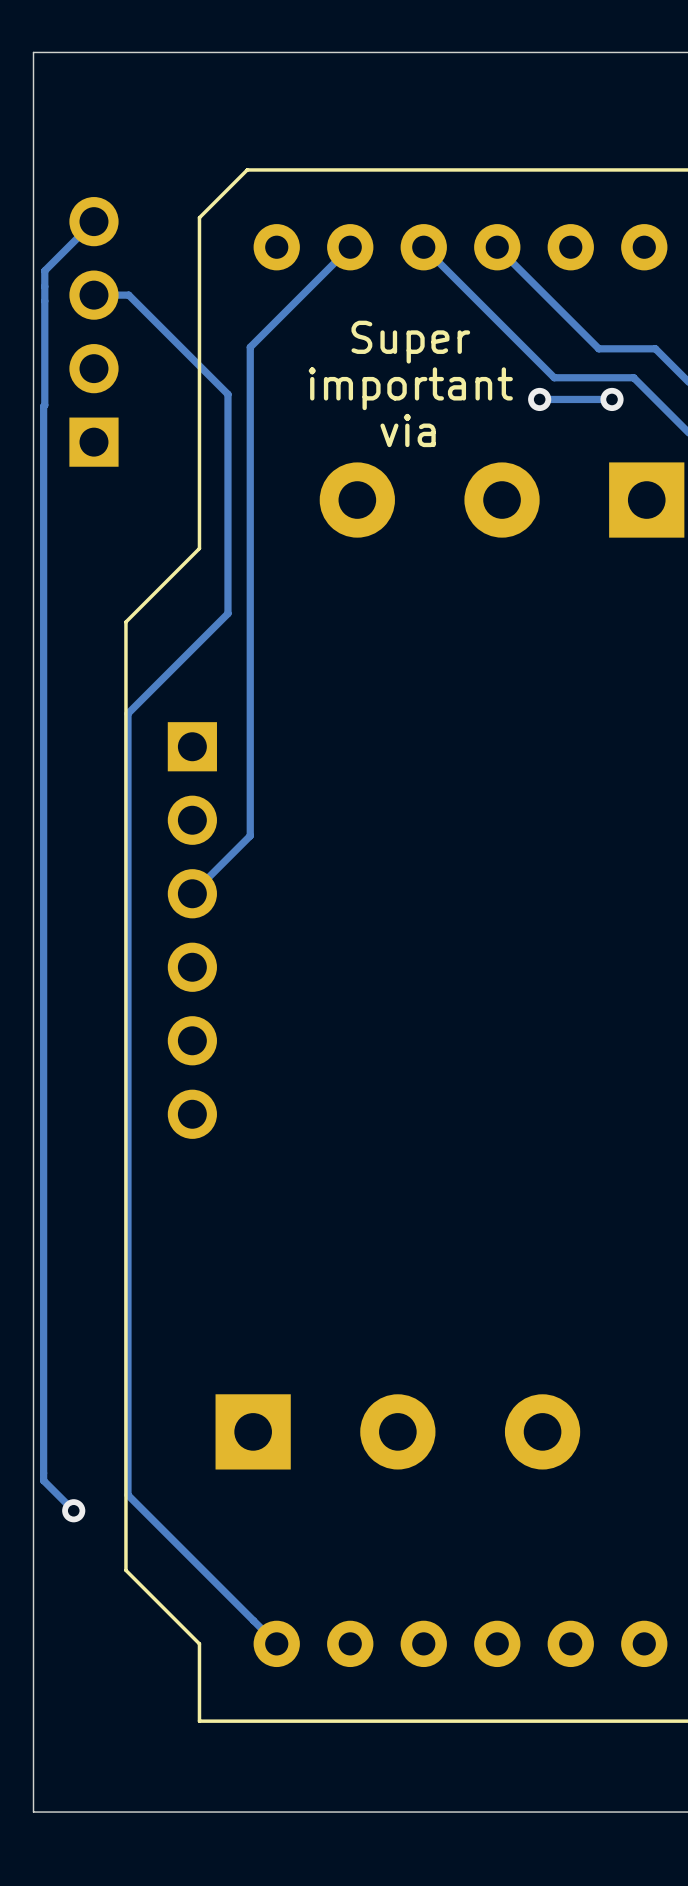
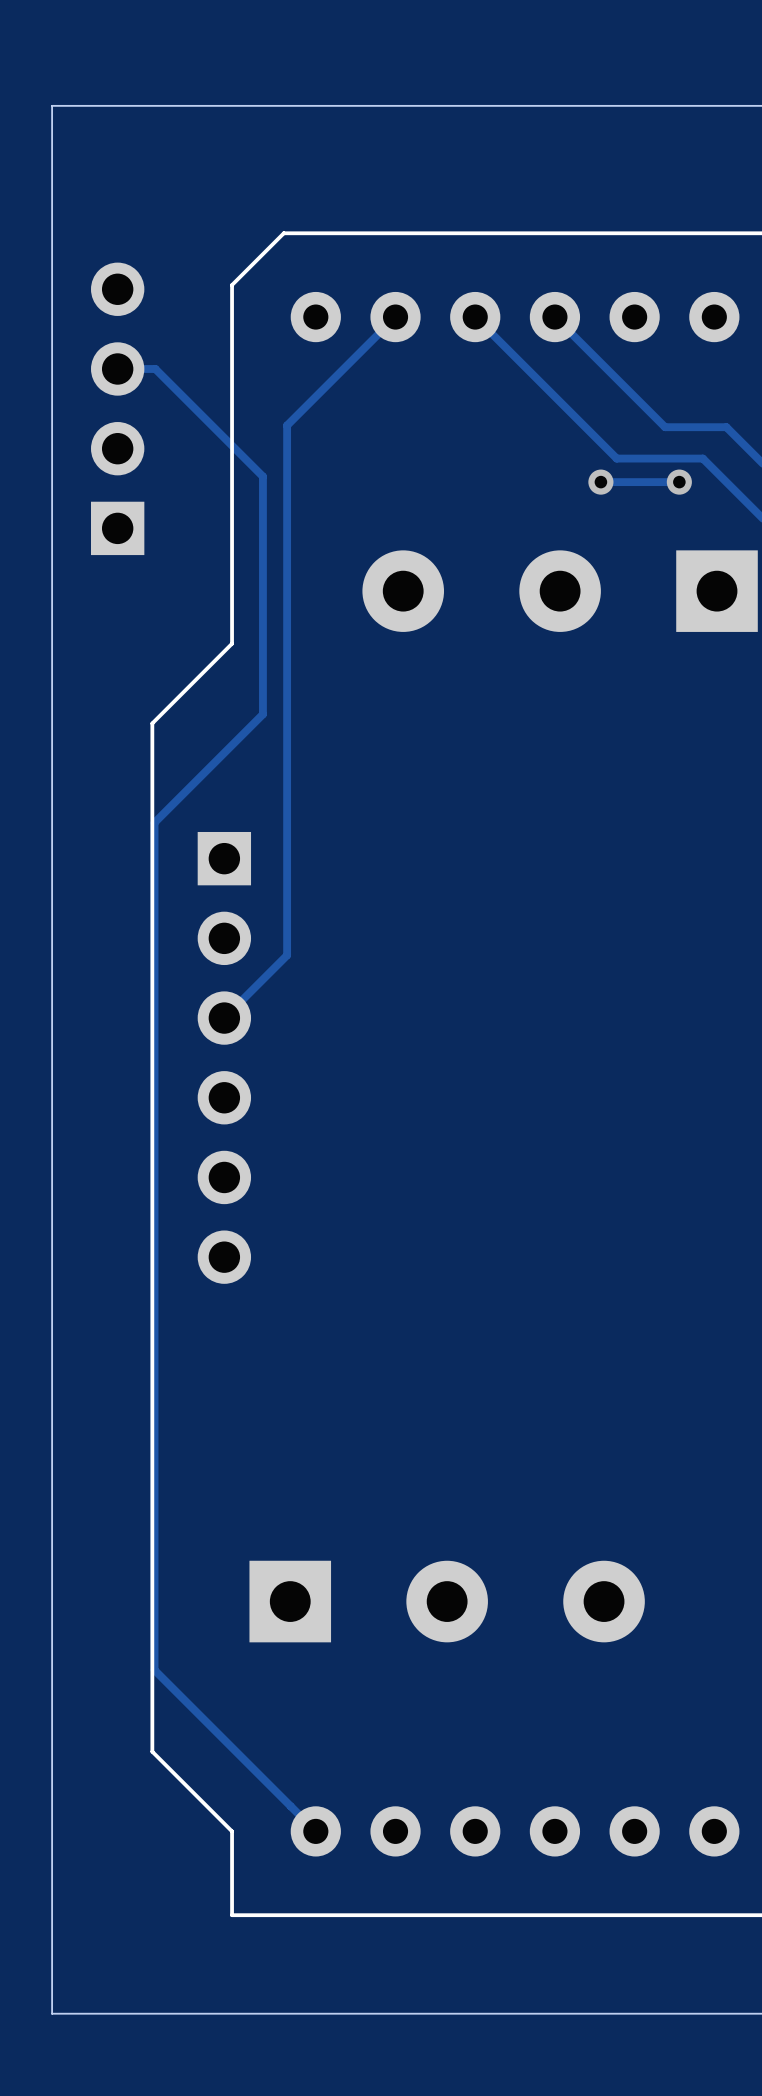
track: (93, 221) (44, 270) (43, 1480) (73, 1510) -> none
text: Super (410, 342) -> none
text: important (410, 388) -> none
text: via (408, 430) -> none
via: (73, 1510) -> none

